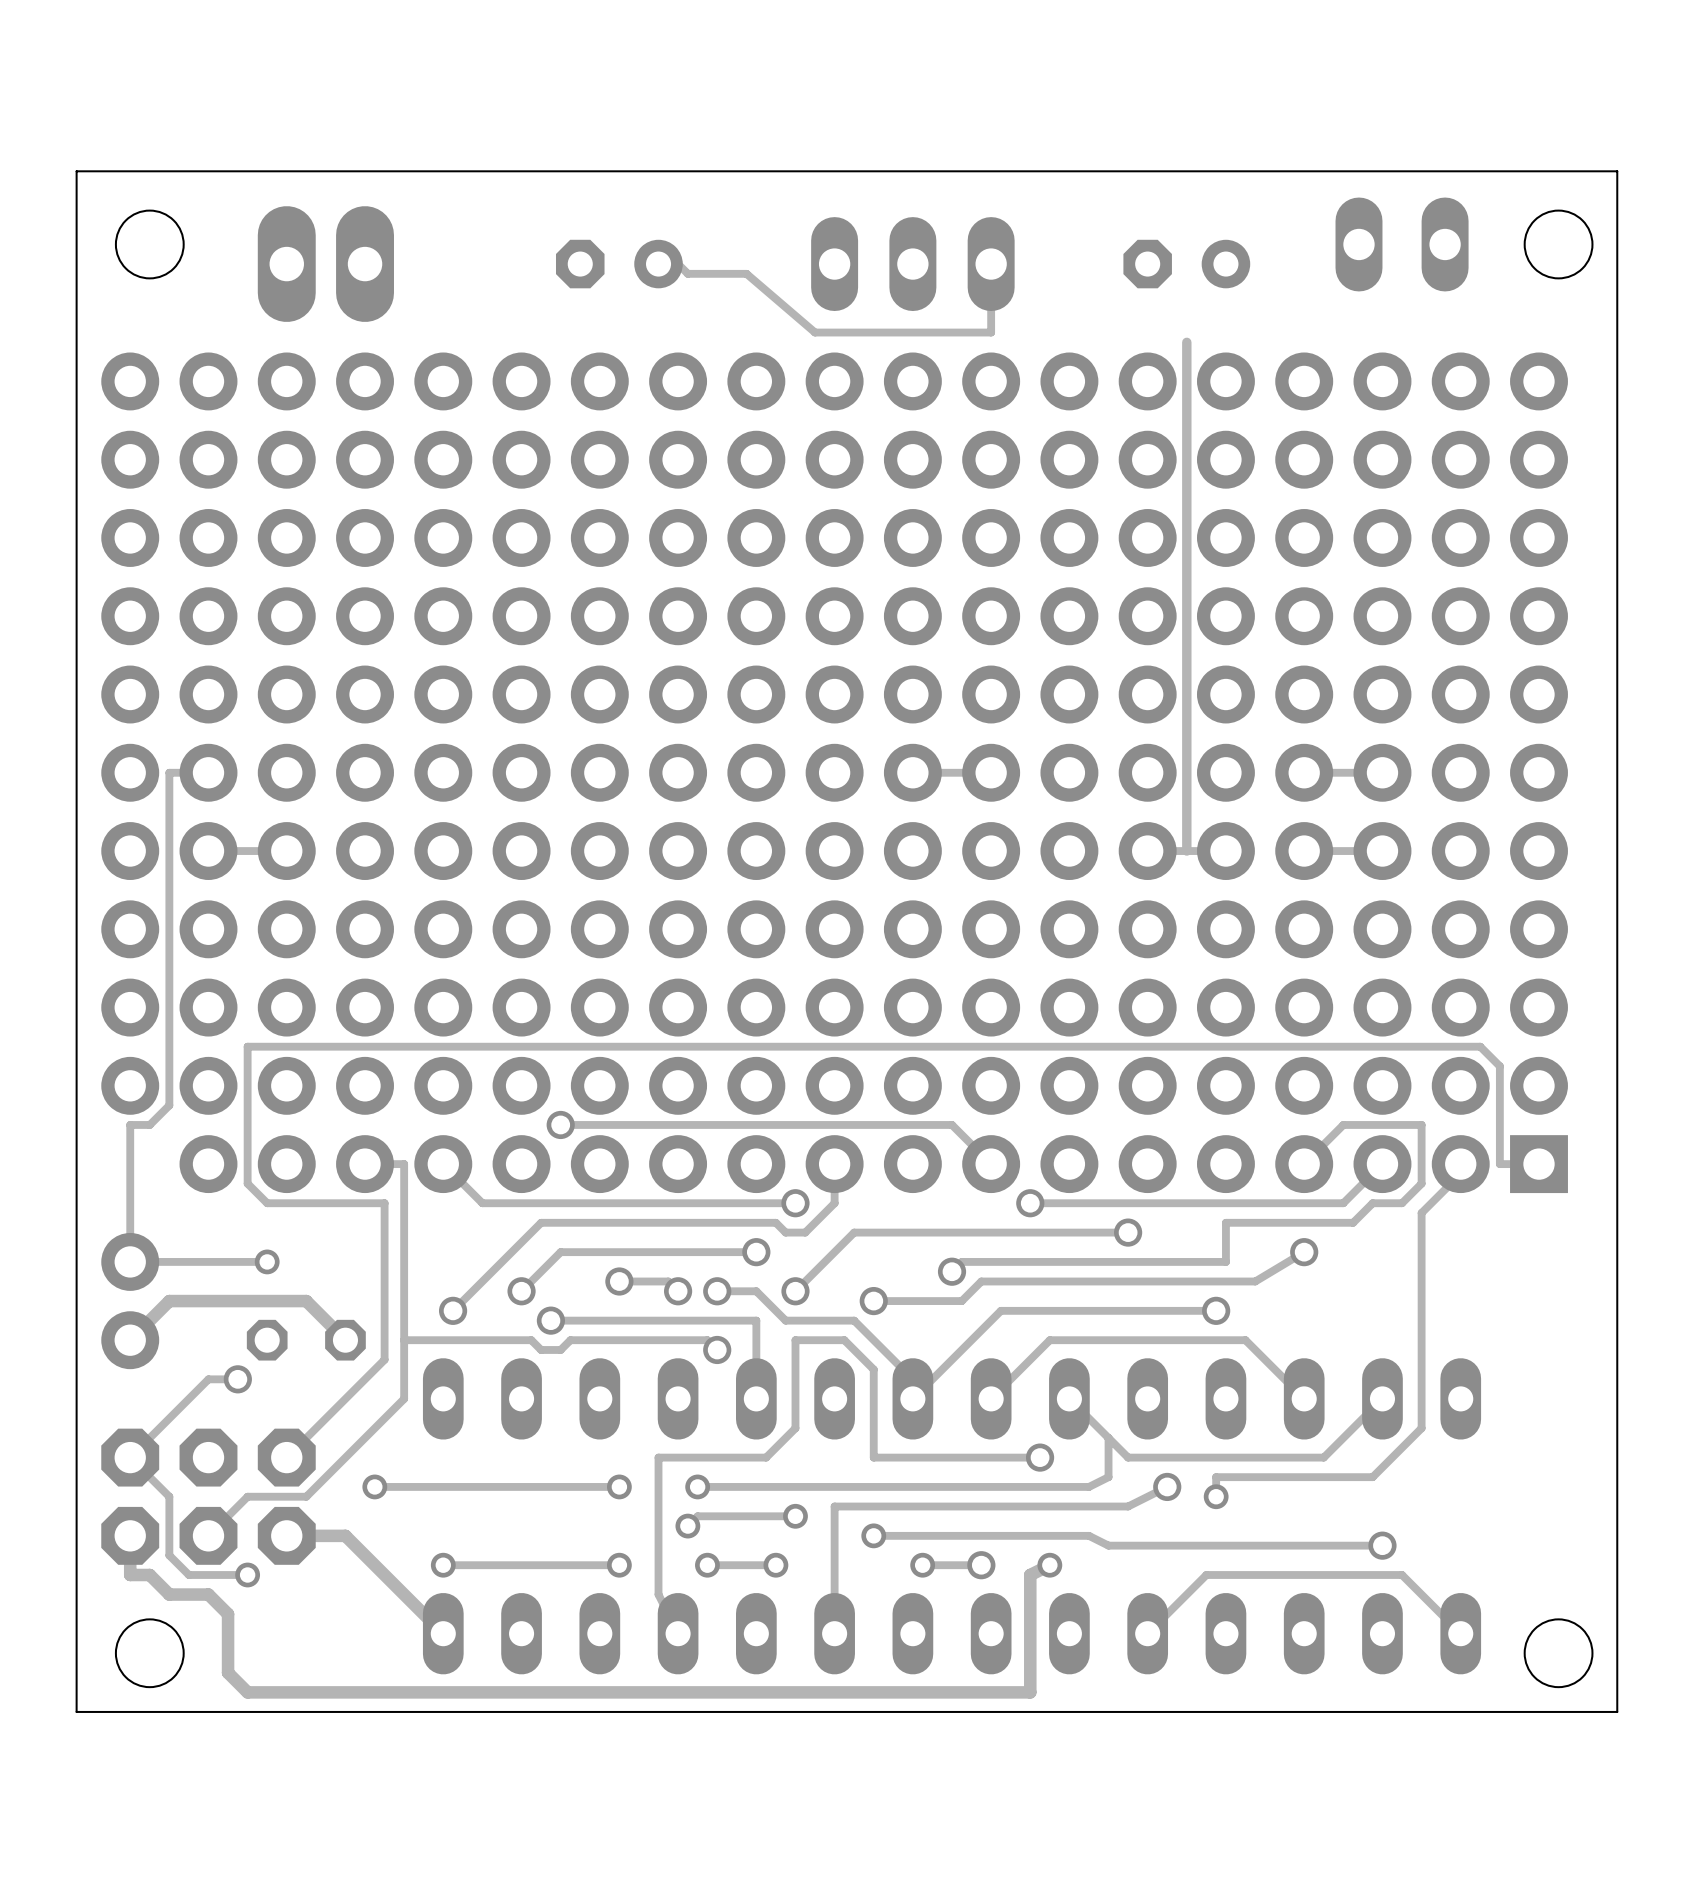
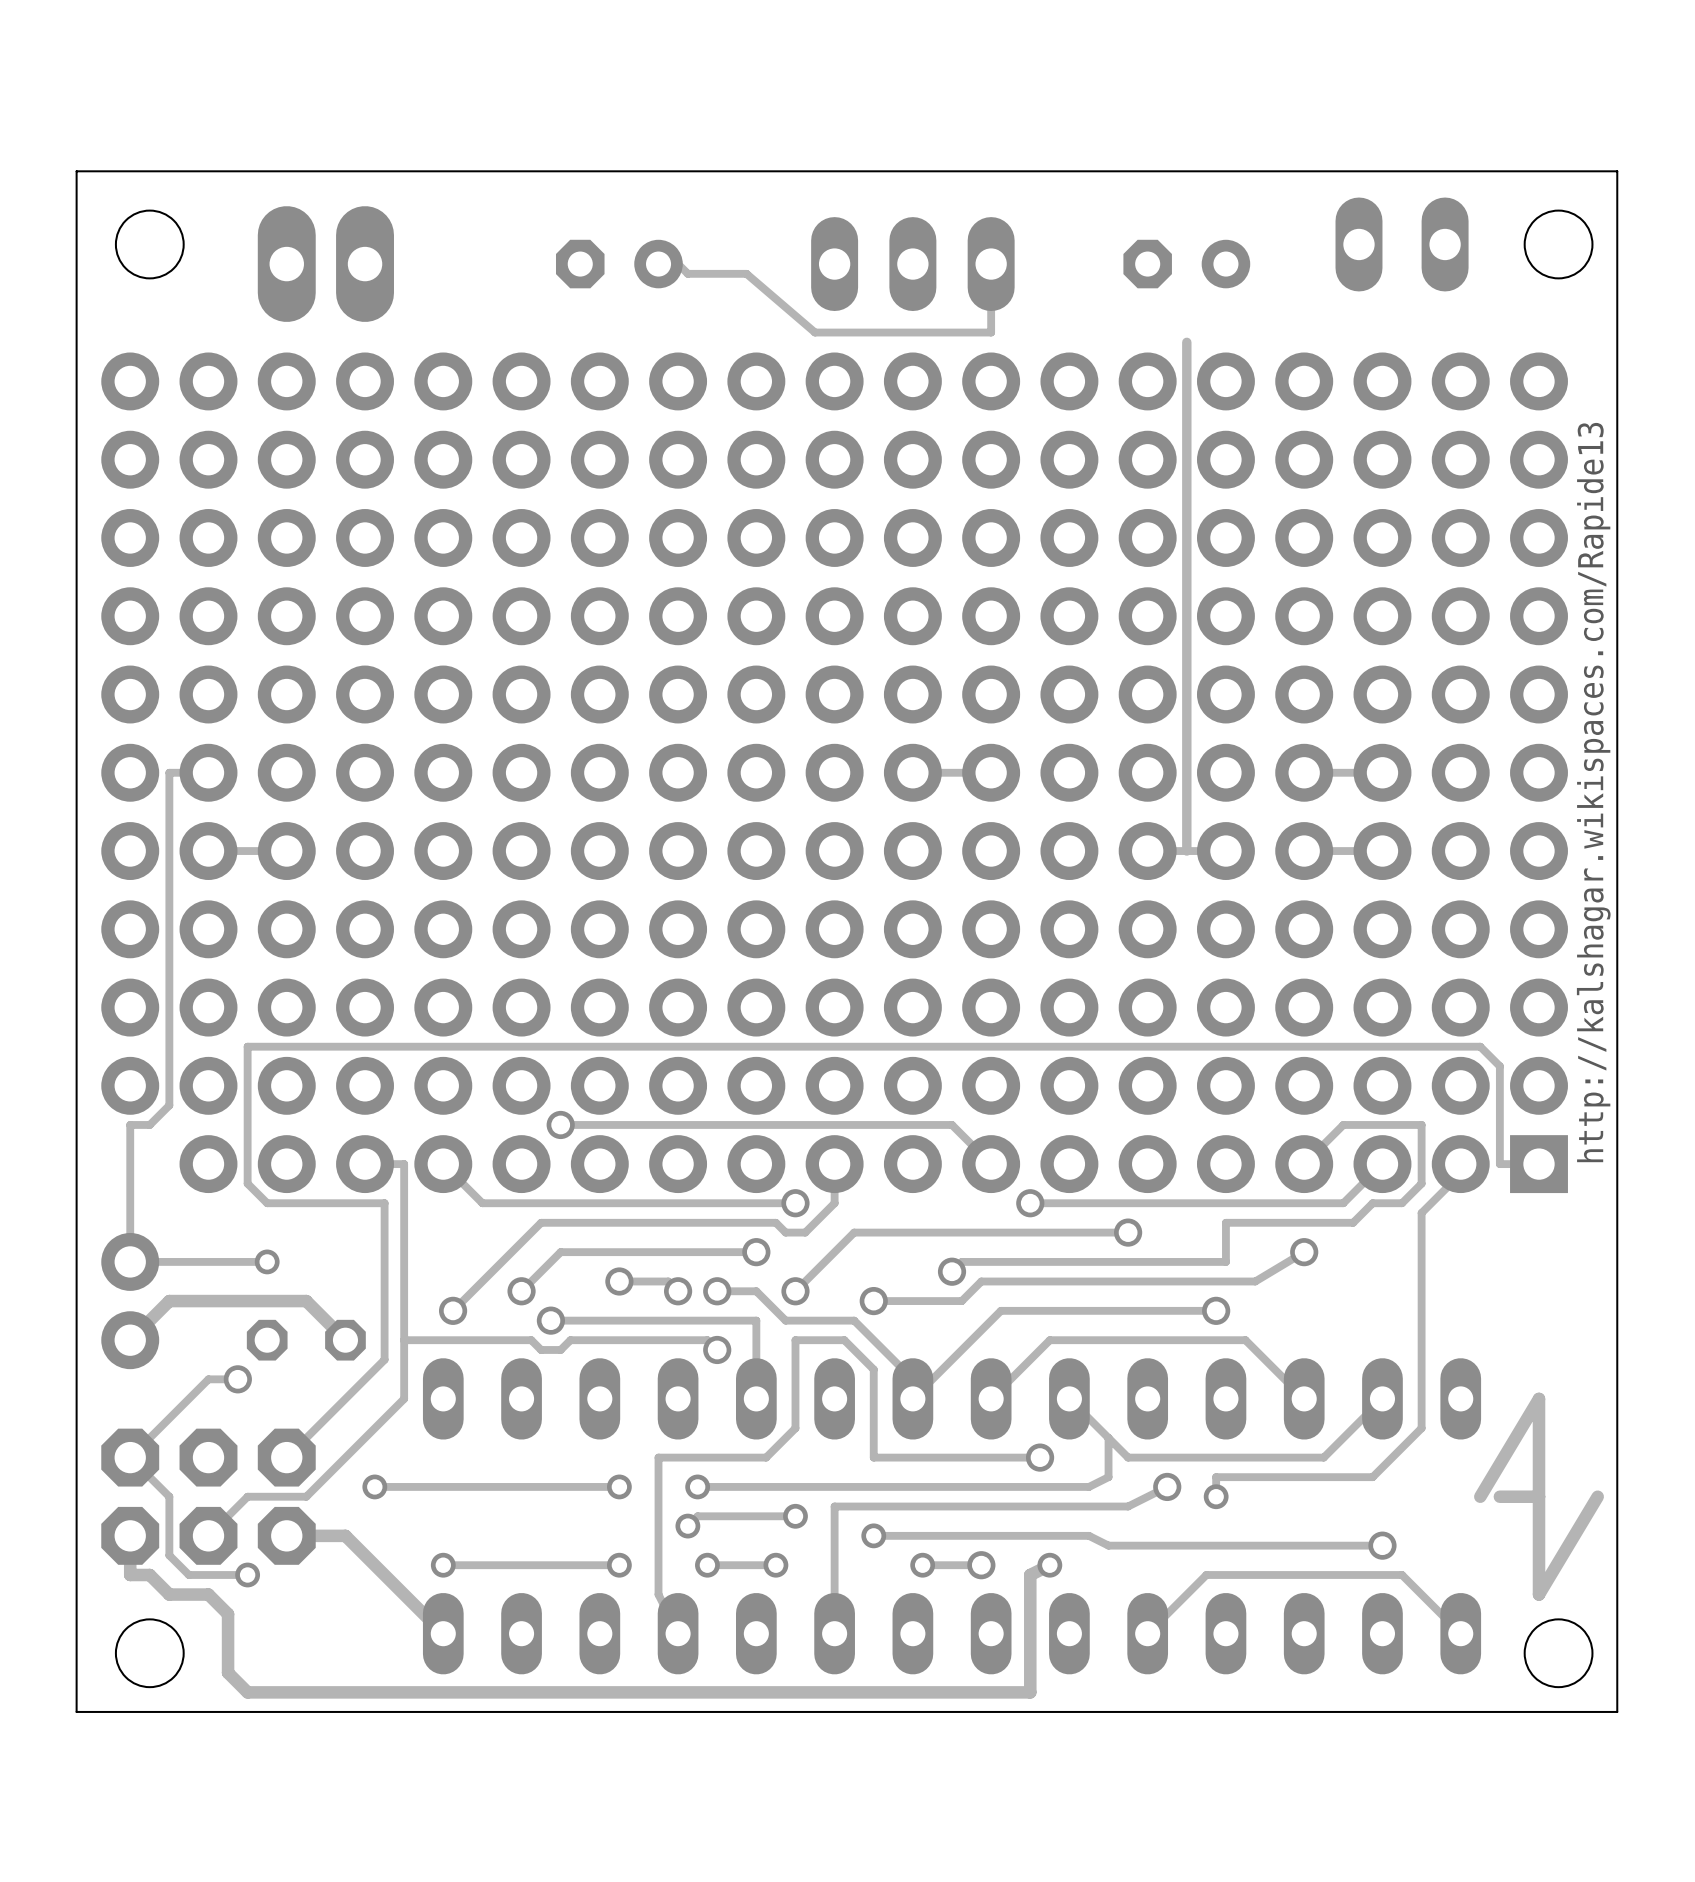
text: none -> http://kalshagar.wikispaces.com/Rapide13 (1593, 792)
track: none -> (1539, 1496) (1499, 1496)
track: none -> (1597, 1496) (1539, 1594) (1539, 1398) (1480, 1496)

